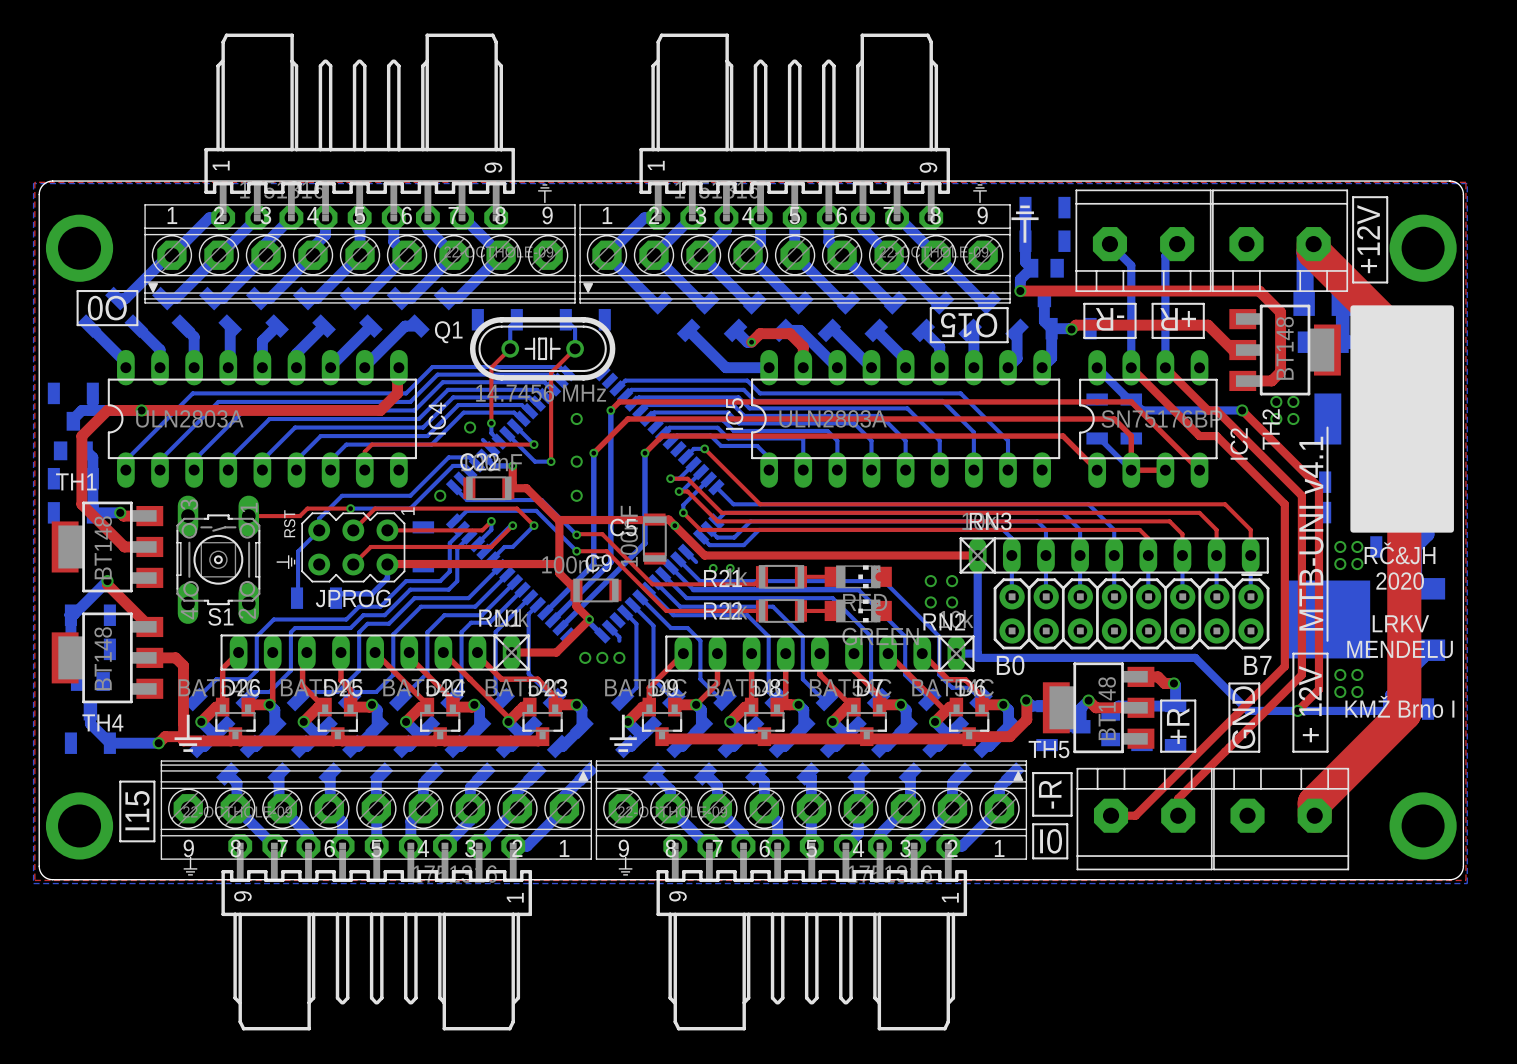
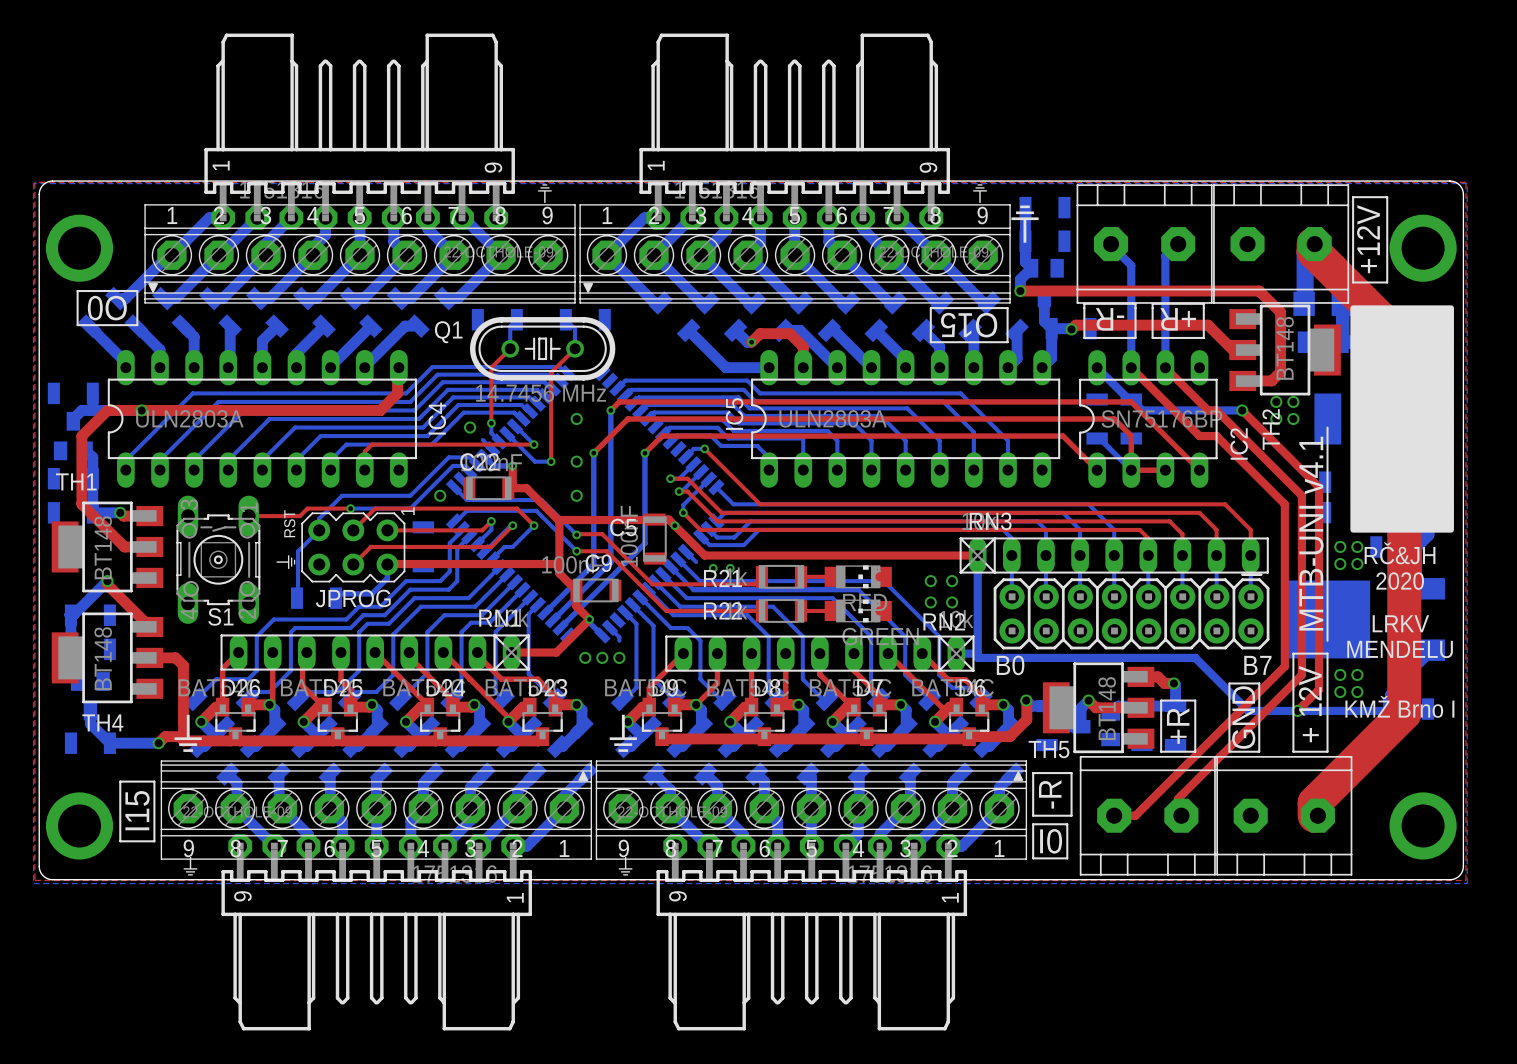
part footprint: [1075, 189, 1212, 292] -> [1076, 184, 1213, 304]
part footprint: [1212, 189, 1349, 292] -> [1213, 184, 1350, 304]
part footprint: [1076, 767, 1213, 871] -> [1079, 756, 1216, 876]
part footprint: [1213, 767, 1350, 871] -> [1216, 756, 1353, 876]

